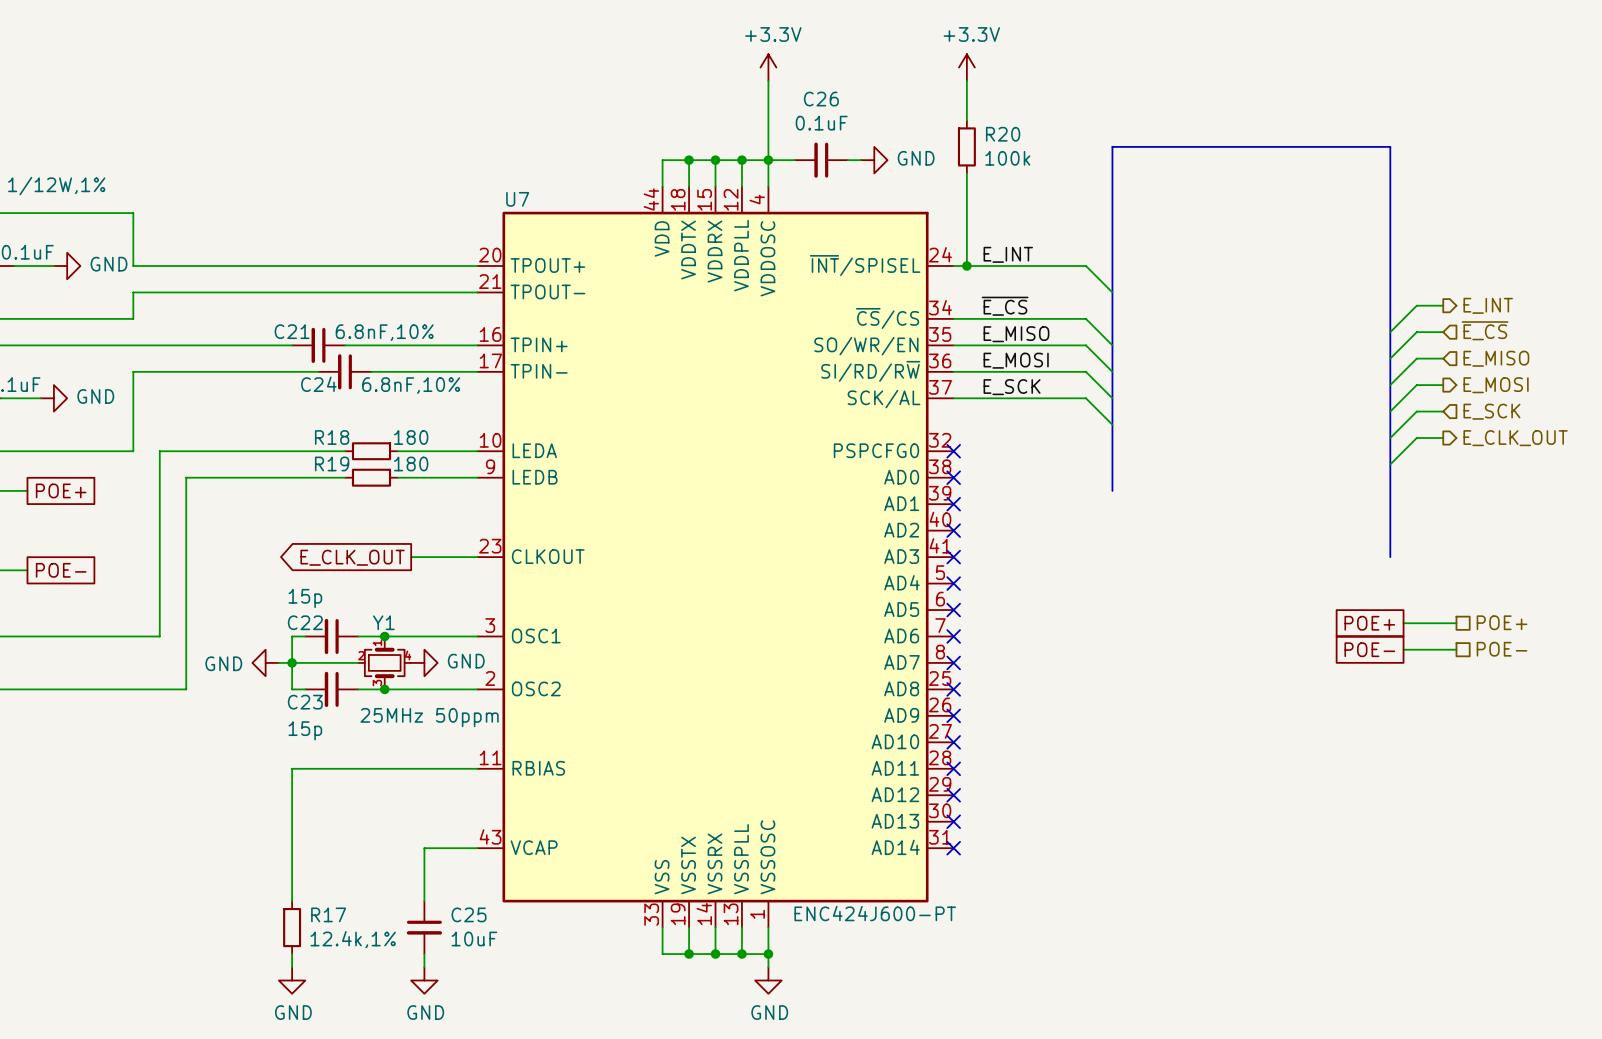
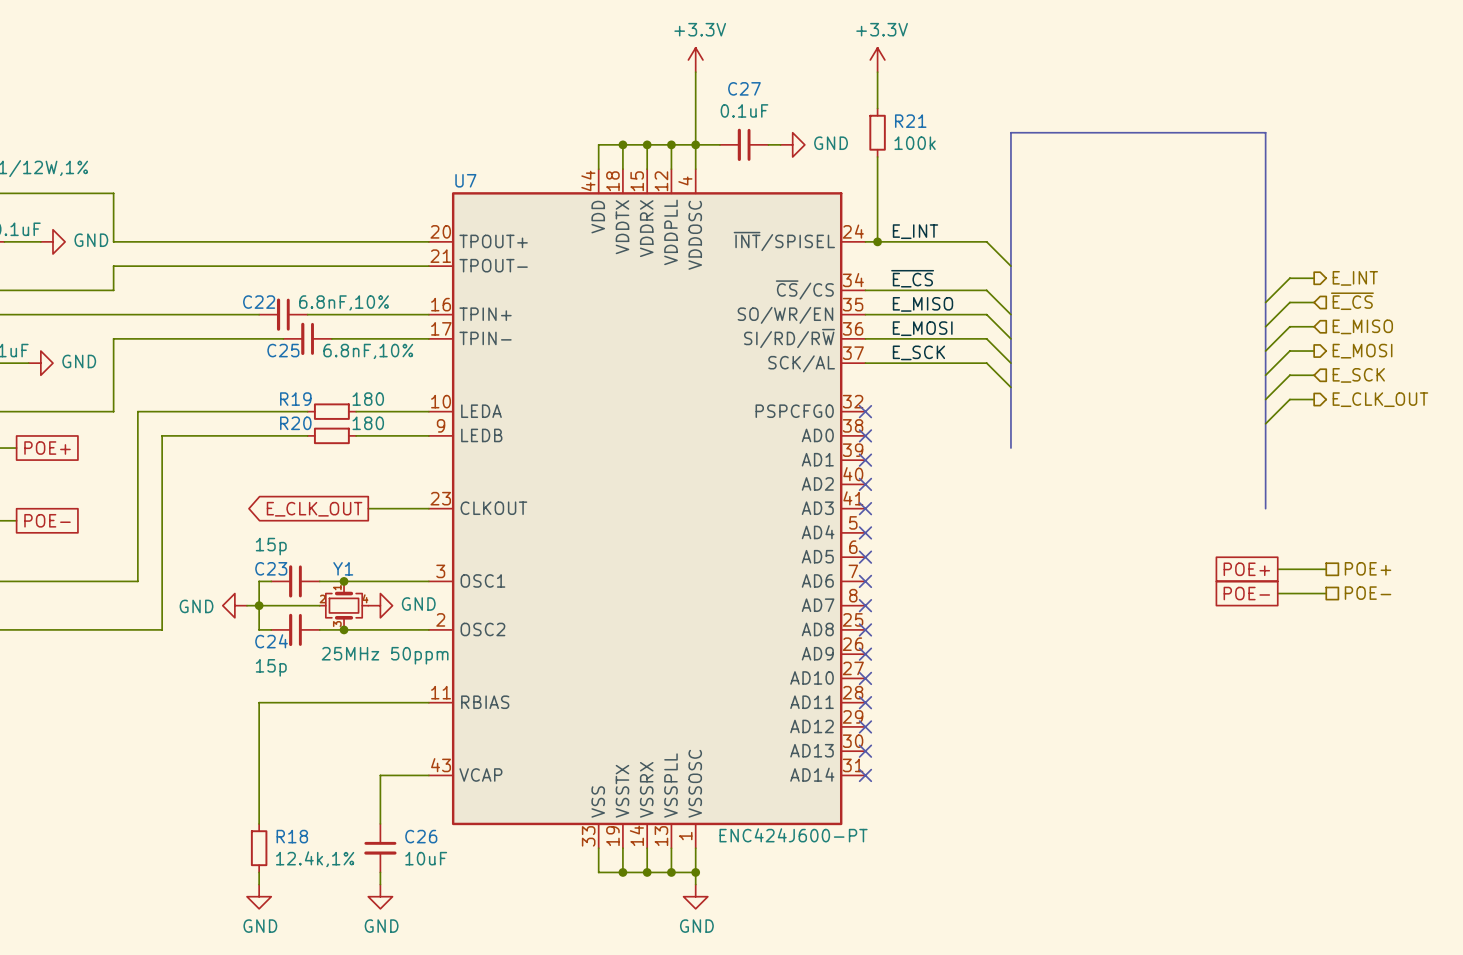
C26 name: C26 (821, 99) -> C27 (744, 88)
R20 name: R20 (1003, 134) -> R21 (910, 121)
C21 name: C21 (292, 331) -> C22 (259, 302)
C24 name: C24 (318, 384) -> C25 (283, 350)
R18 name: R18 (332, 437) -> R19 (295, 399)
R19 name: R19 (332, 463) -> R20 (295, 423)
C22 name: C22 (305, 622) -> C23 (271, 568)
C23 name: C23 (305, 702) -> C24 (271, 641)
R17 name: R17 (328, 914) -> R18 (292, 836)
C25 name: C25 (469, 914) -> C26 (421, 836)

